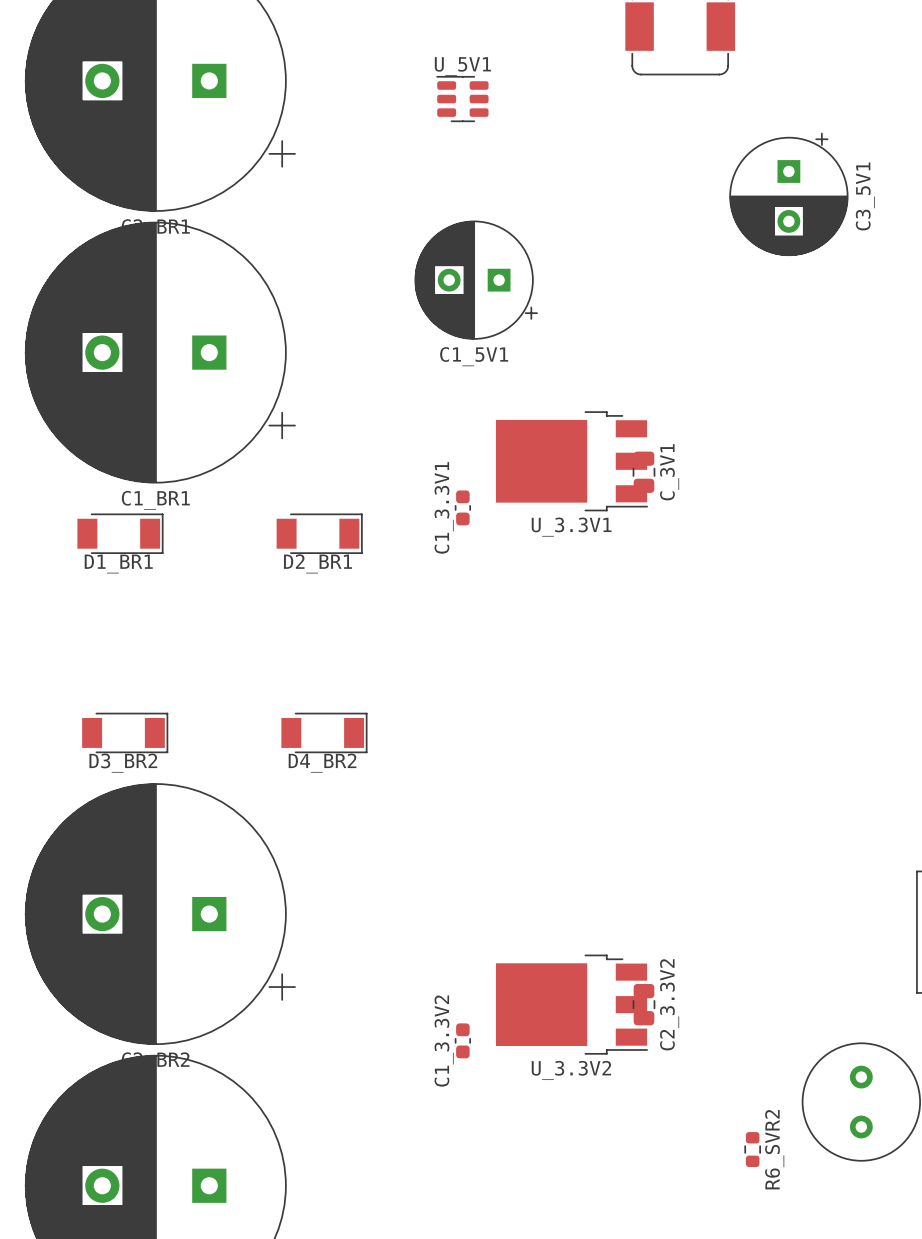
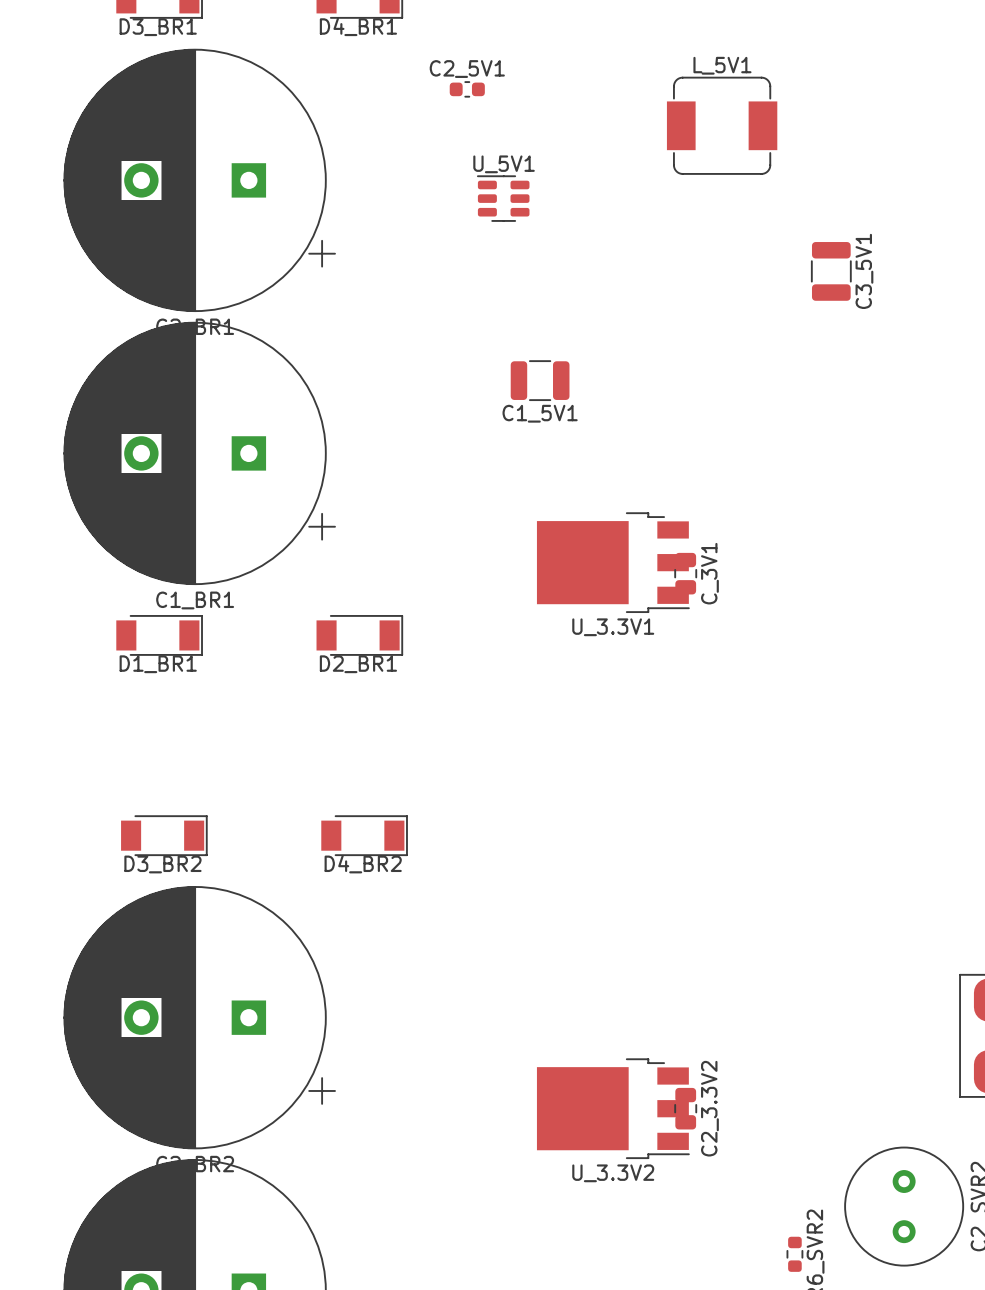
C3_5V1 footprint: [729, 132, 849, 257] -> [810, 242, 852, 301]
C3_5V1 name position: C3_5V1 (865, 196) -> C3_5V1 (864, 271)
C1_5V1 footprint: [414, 220, 538, 340] -> [510, 360, 570, 401]
C1_5V1 name position: C1_5V1 (474, 356) -> C1_5V1 (540, 413)
C1_3.3V1: (462, 507) -> none
C1_3.3V2: (462, 1040) -> none

